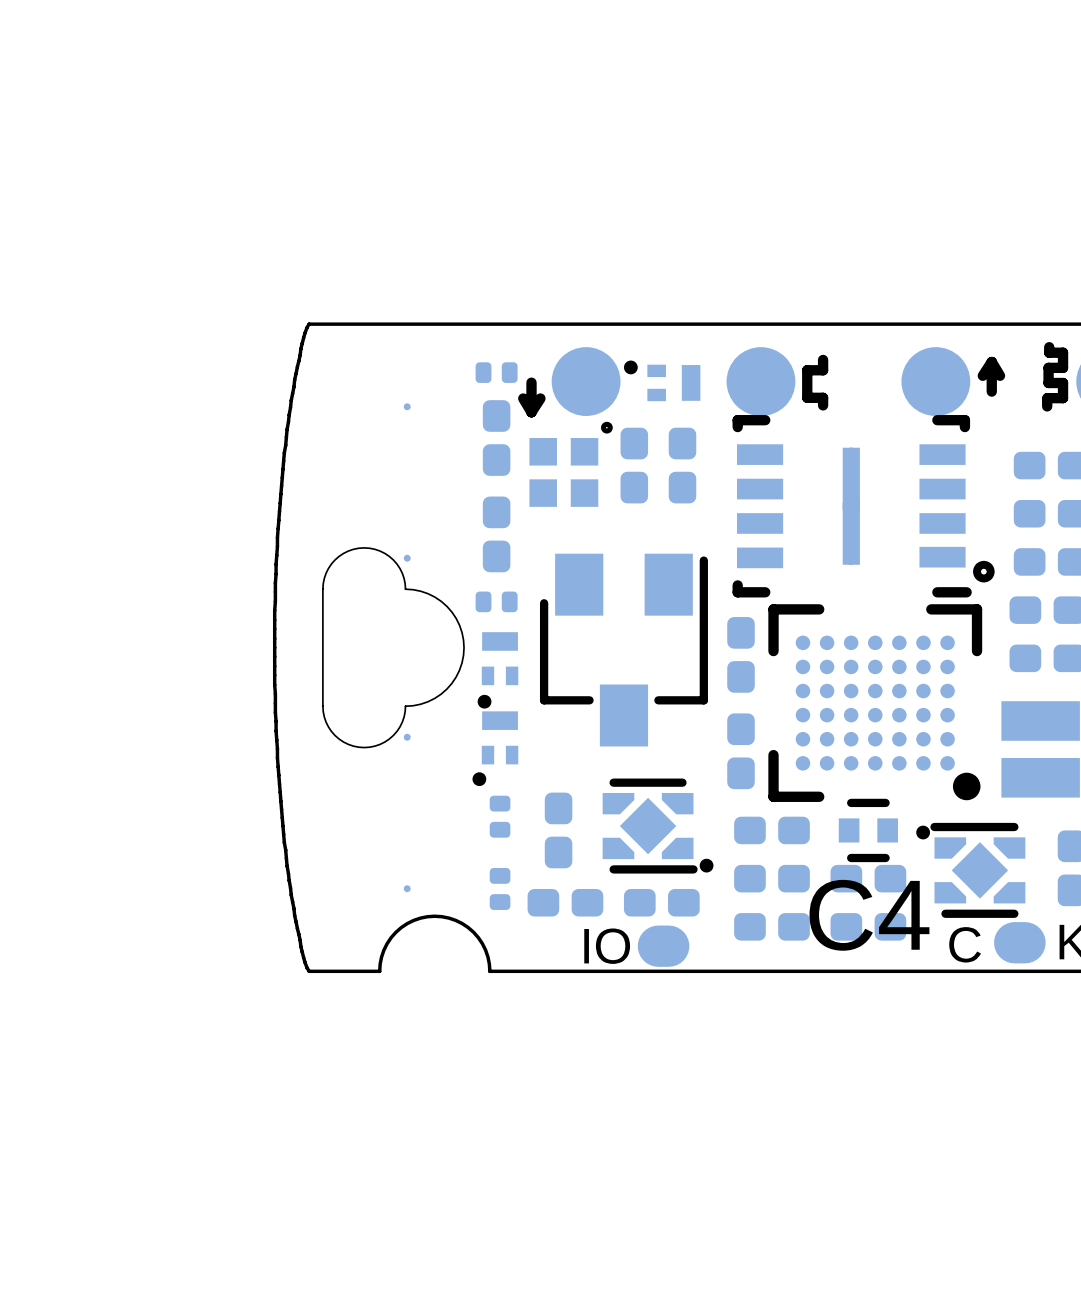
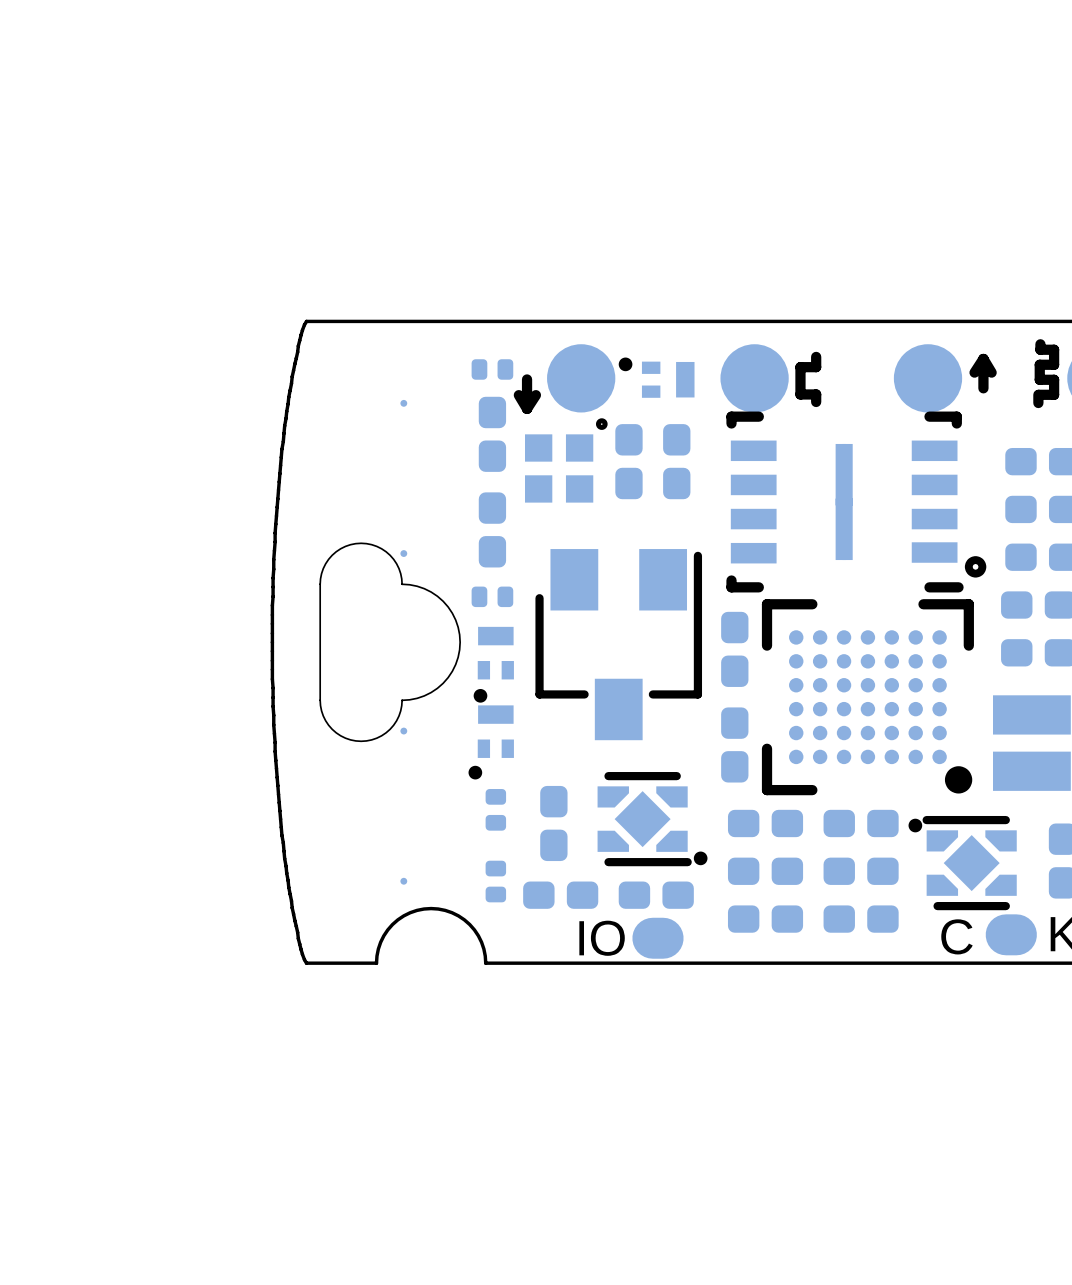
C4: (868, 830) -> none
part: none -> (861, 823)

